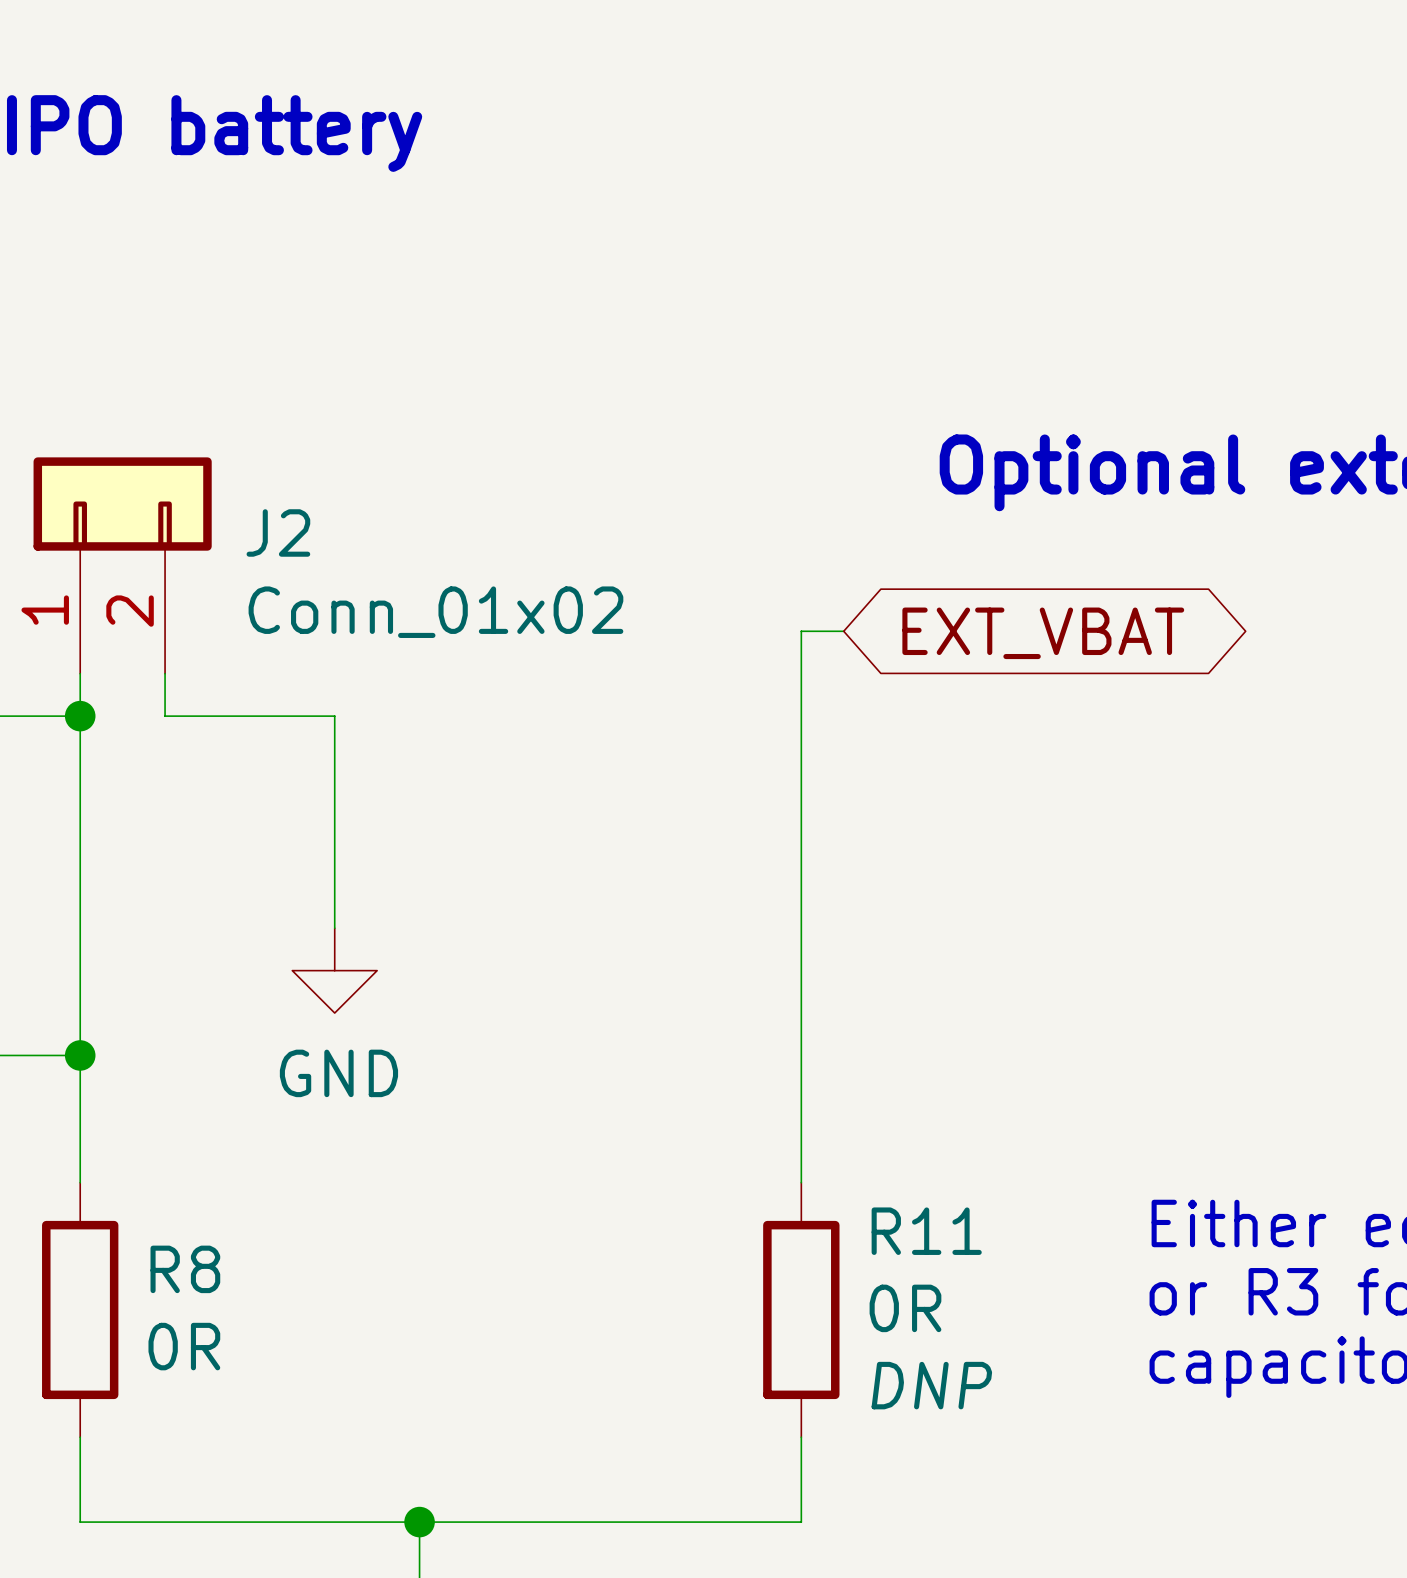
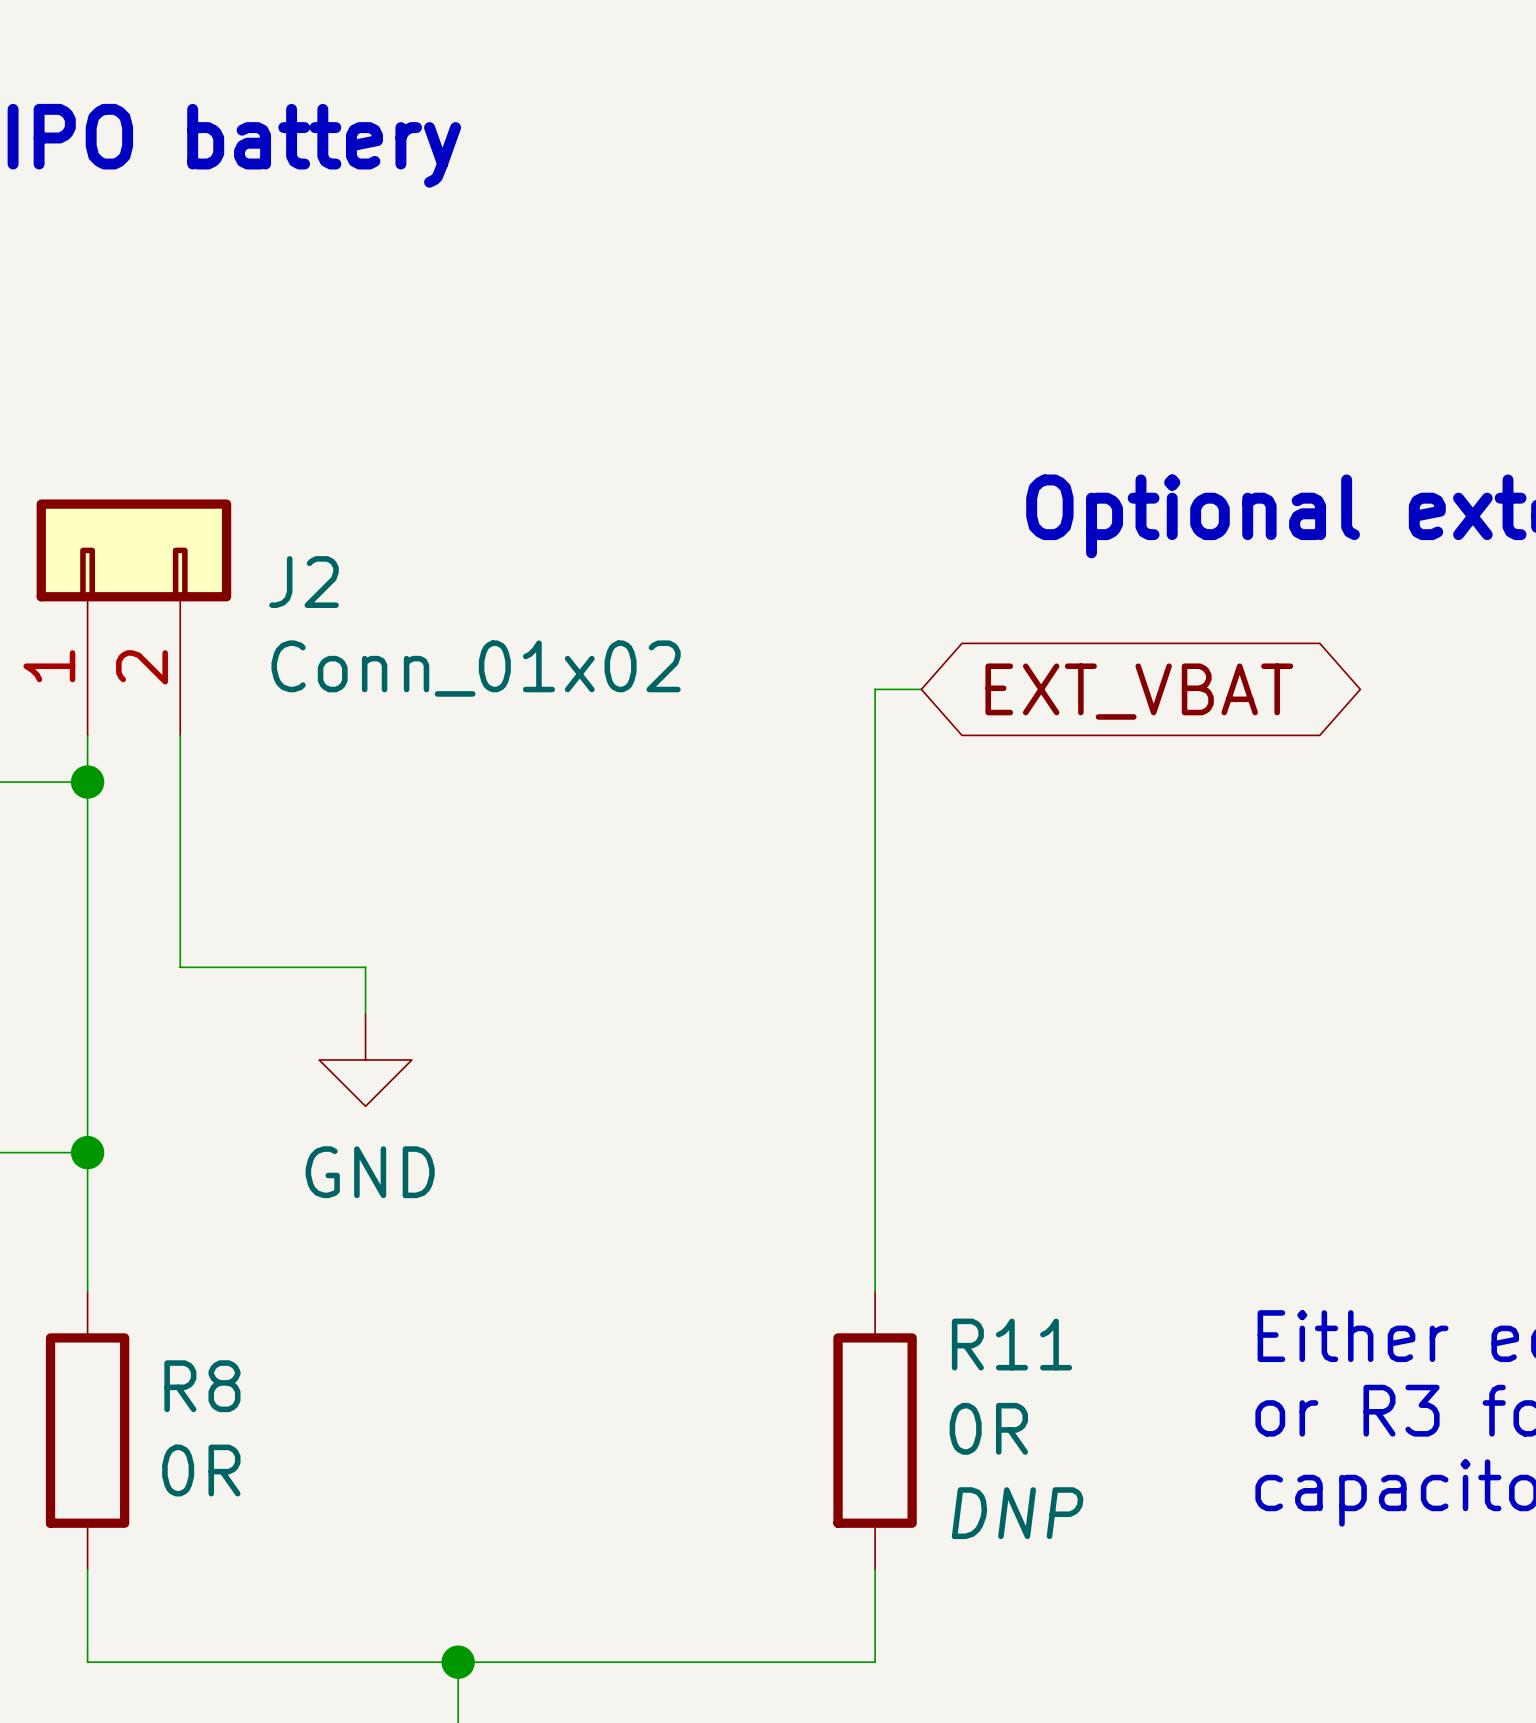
wire: (165, 716) (334, 716) (334, 885) -> (180, 782) (180, 967) (365, 967)

